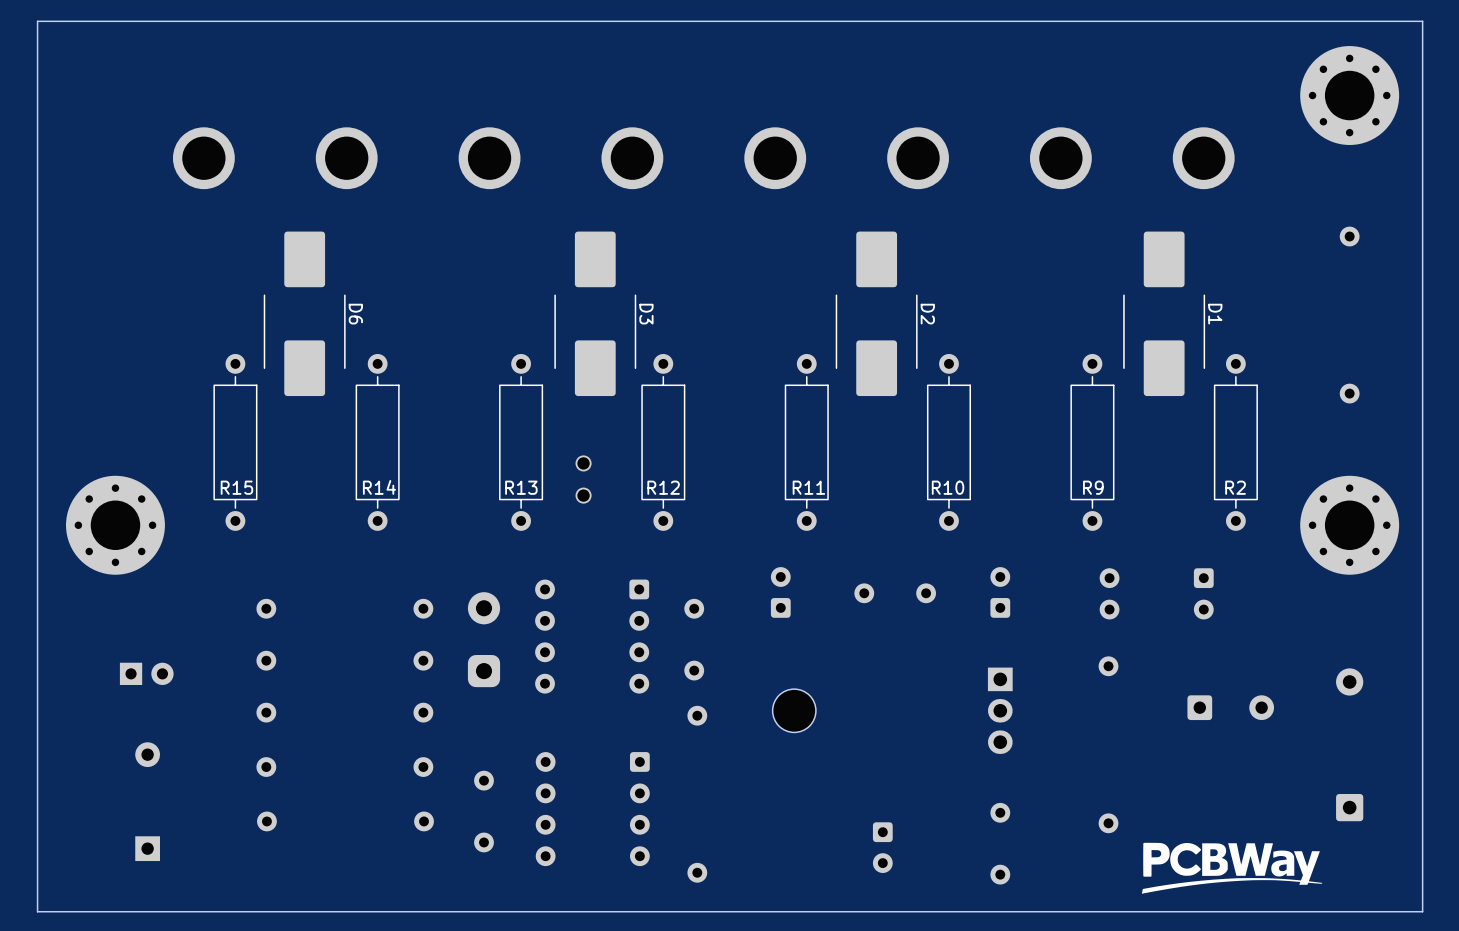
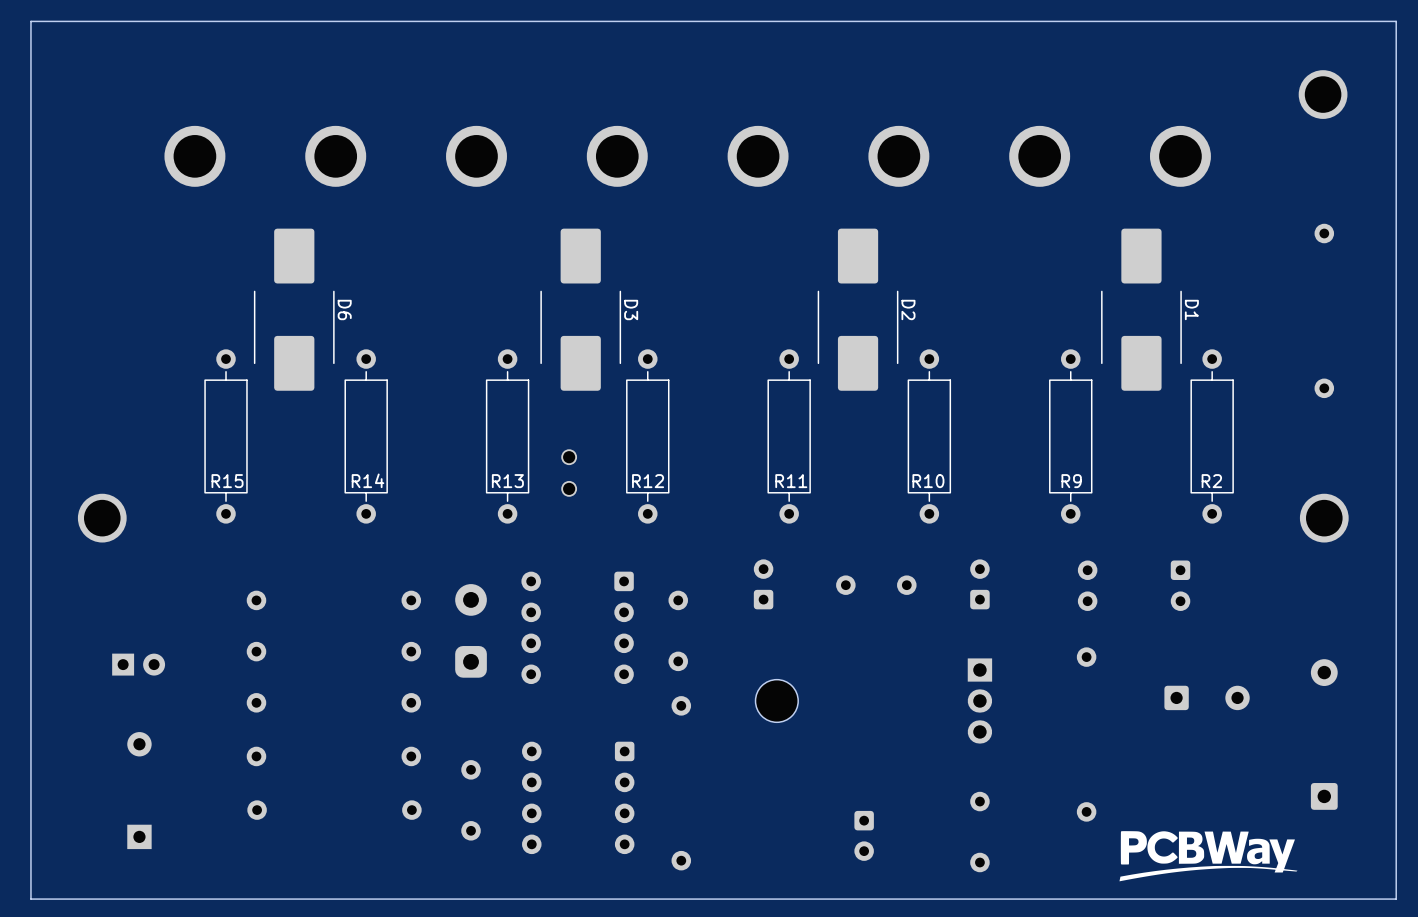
part footprint: [1300, 46, 1400, 145] -> [1298, 70, 1348, 119]
part footprint: [66, 475, 165, 575] -> [77, 493, 127, 543]
part footprint: [1300, 475, 1400, 575] -> [1299, 493, 1349, 543]

